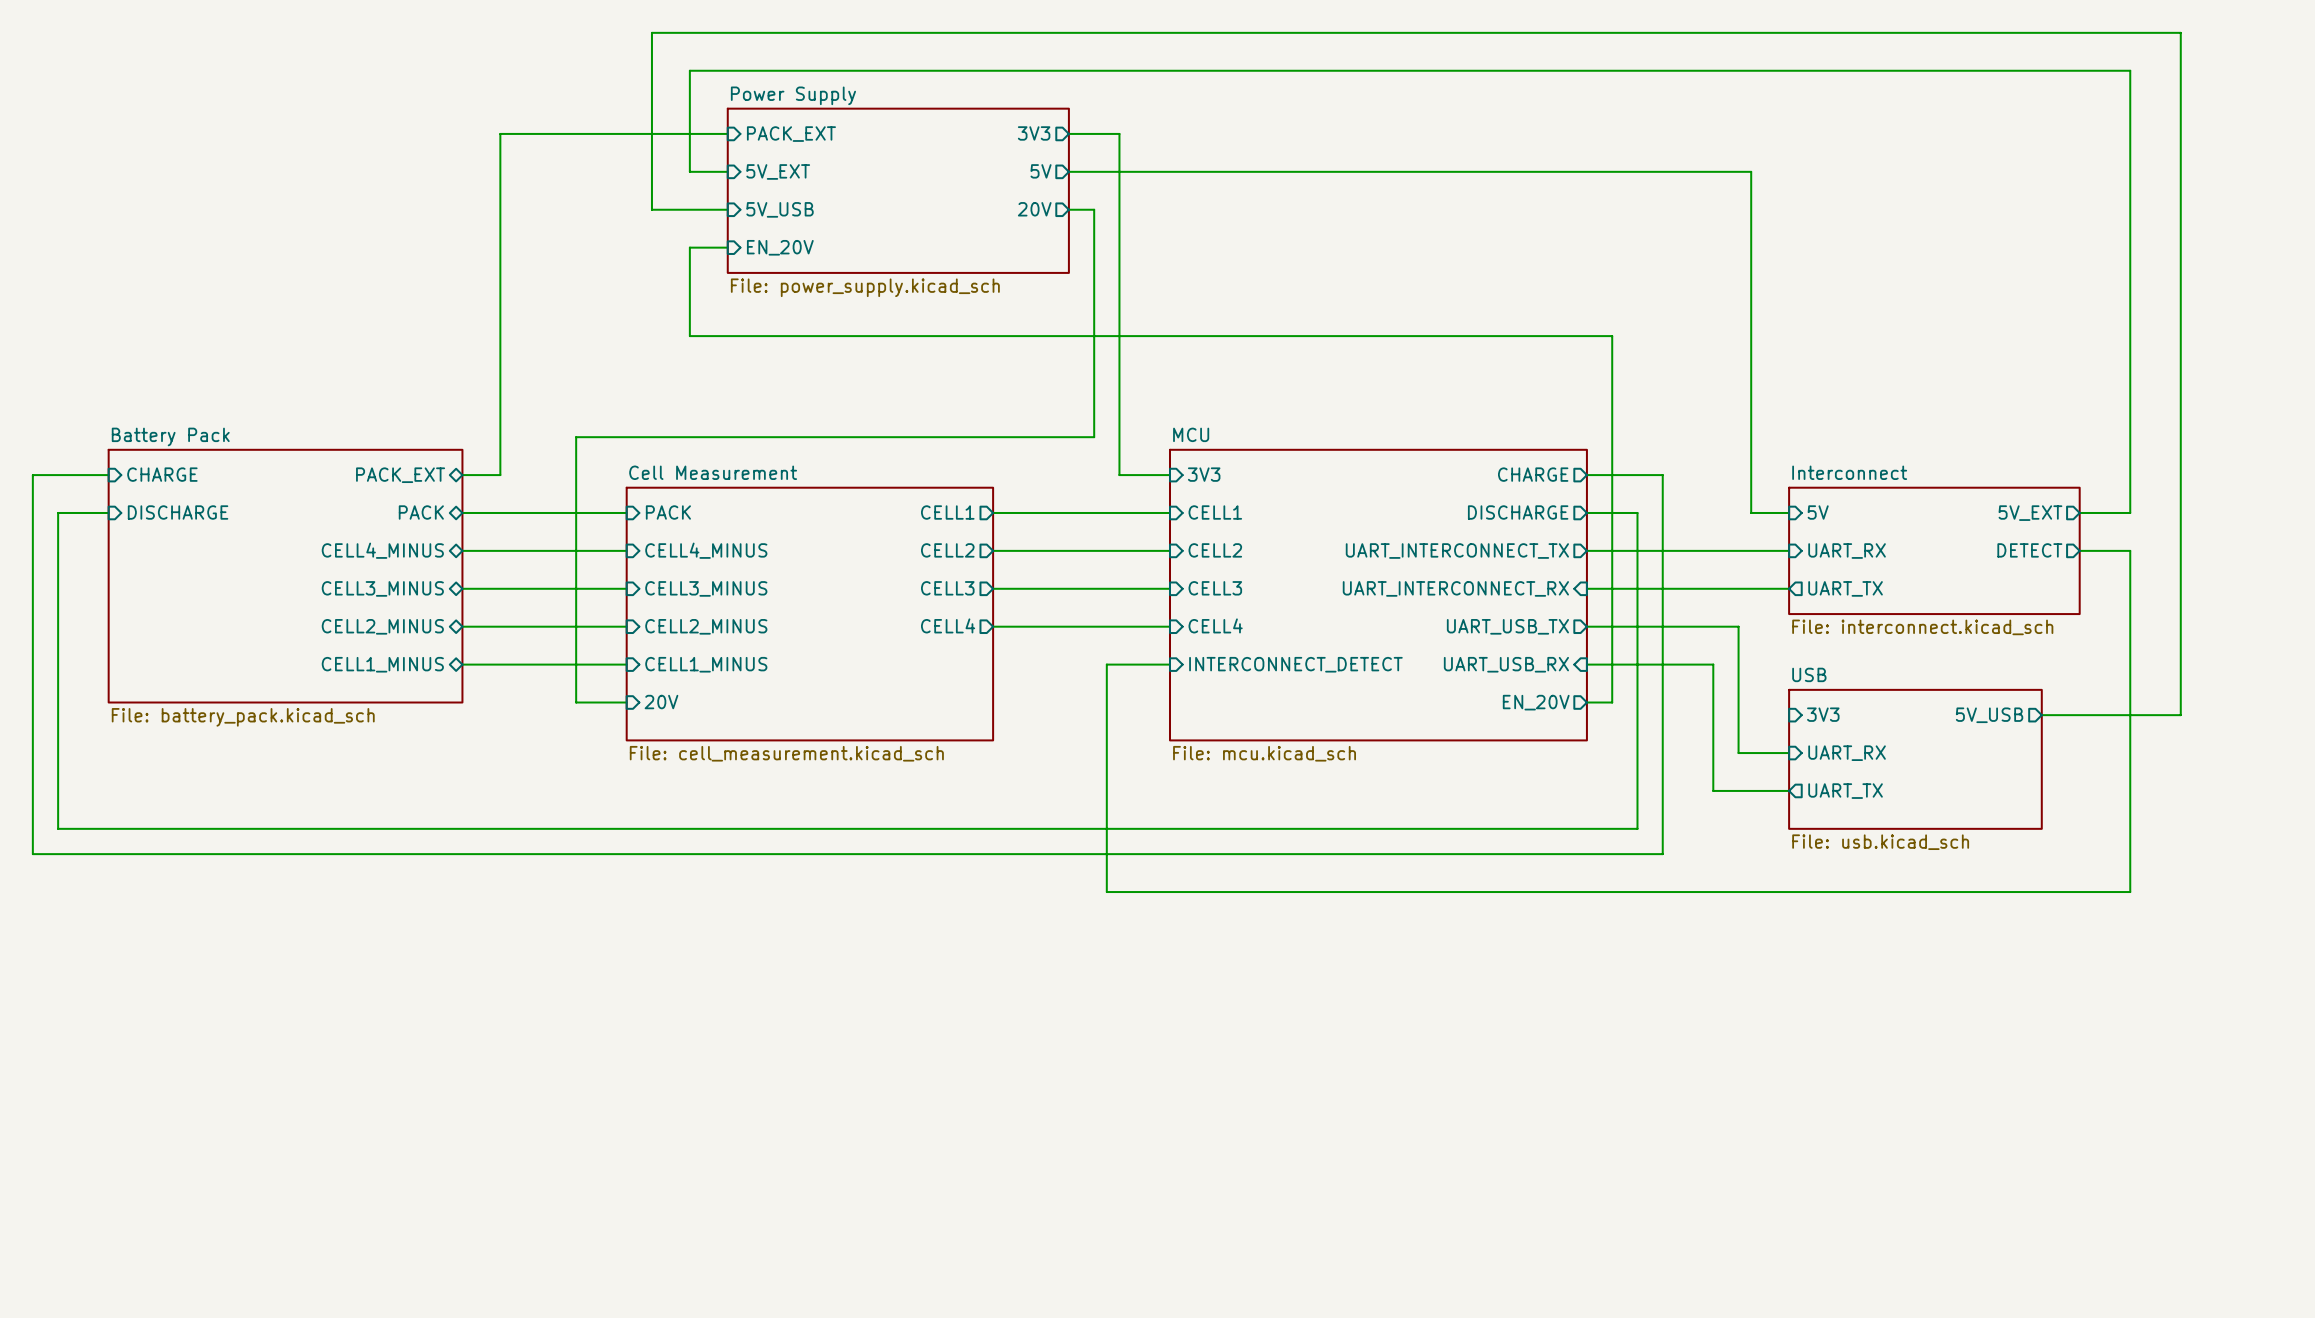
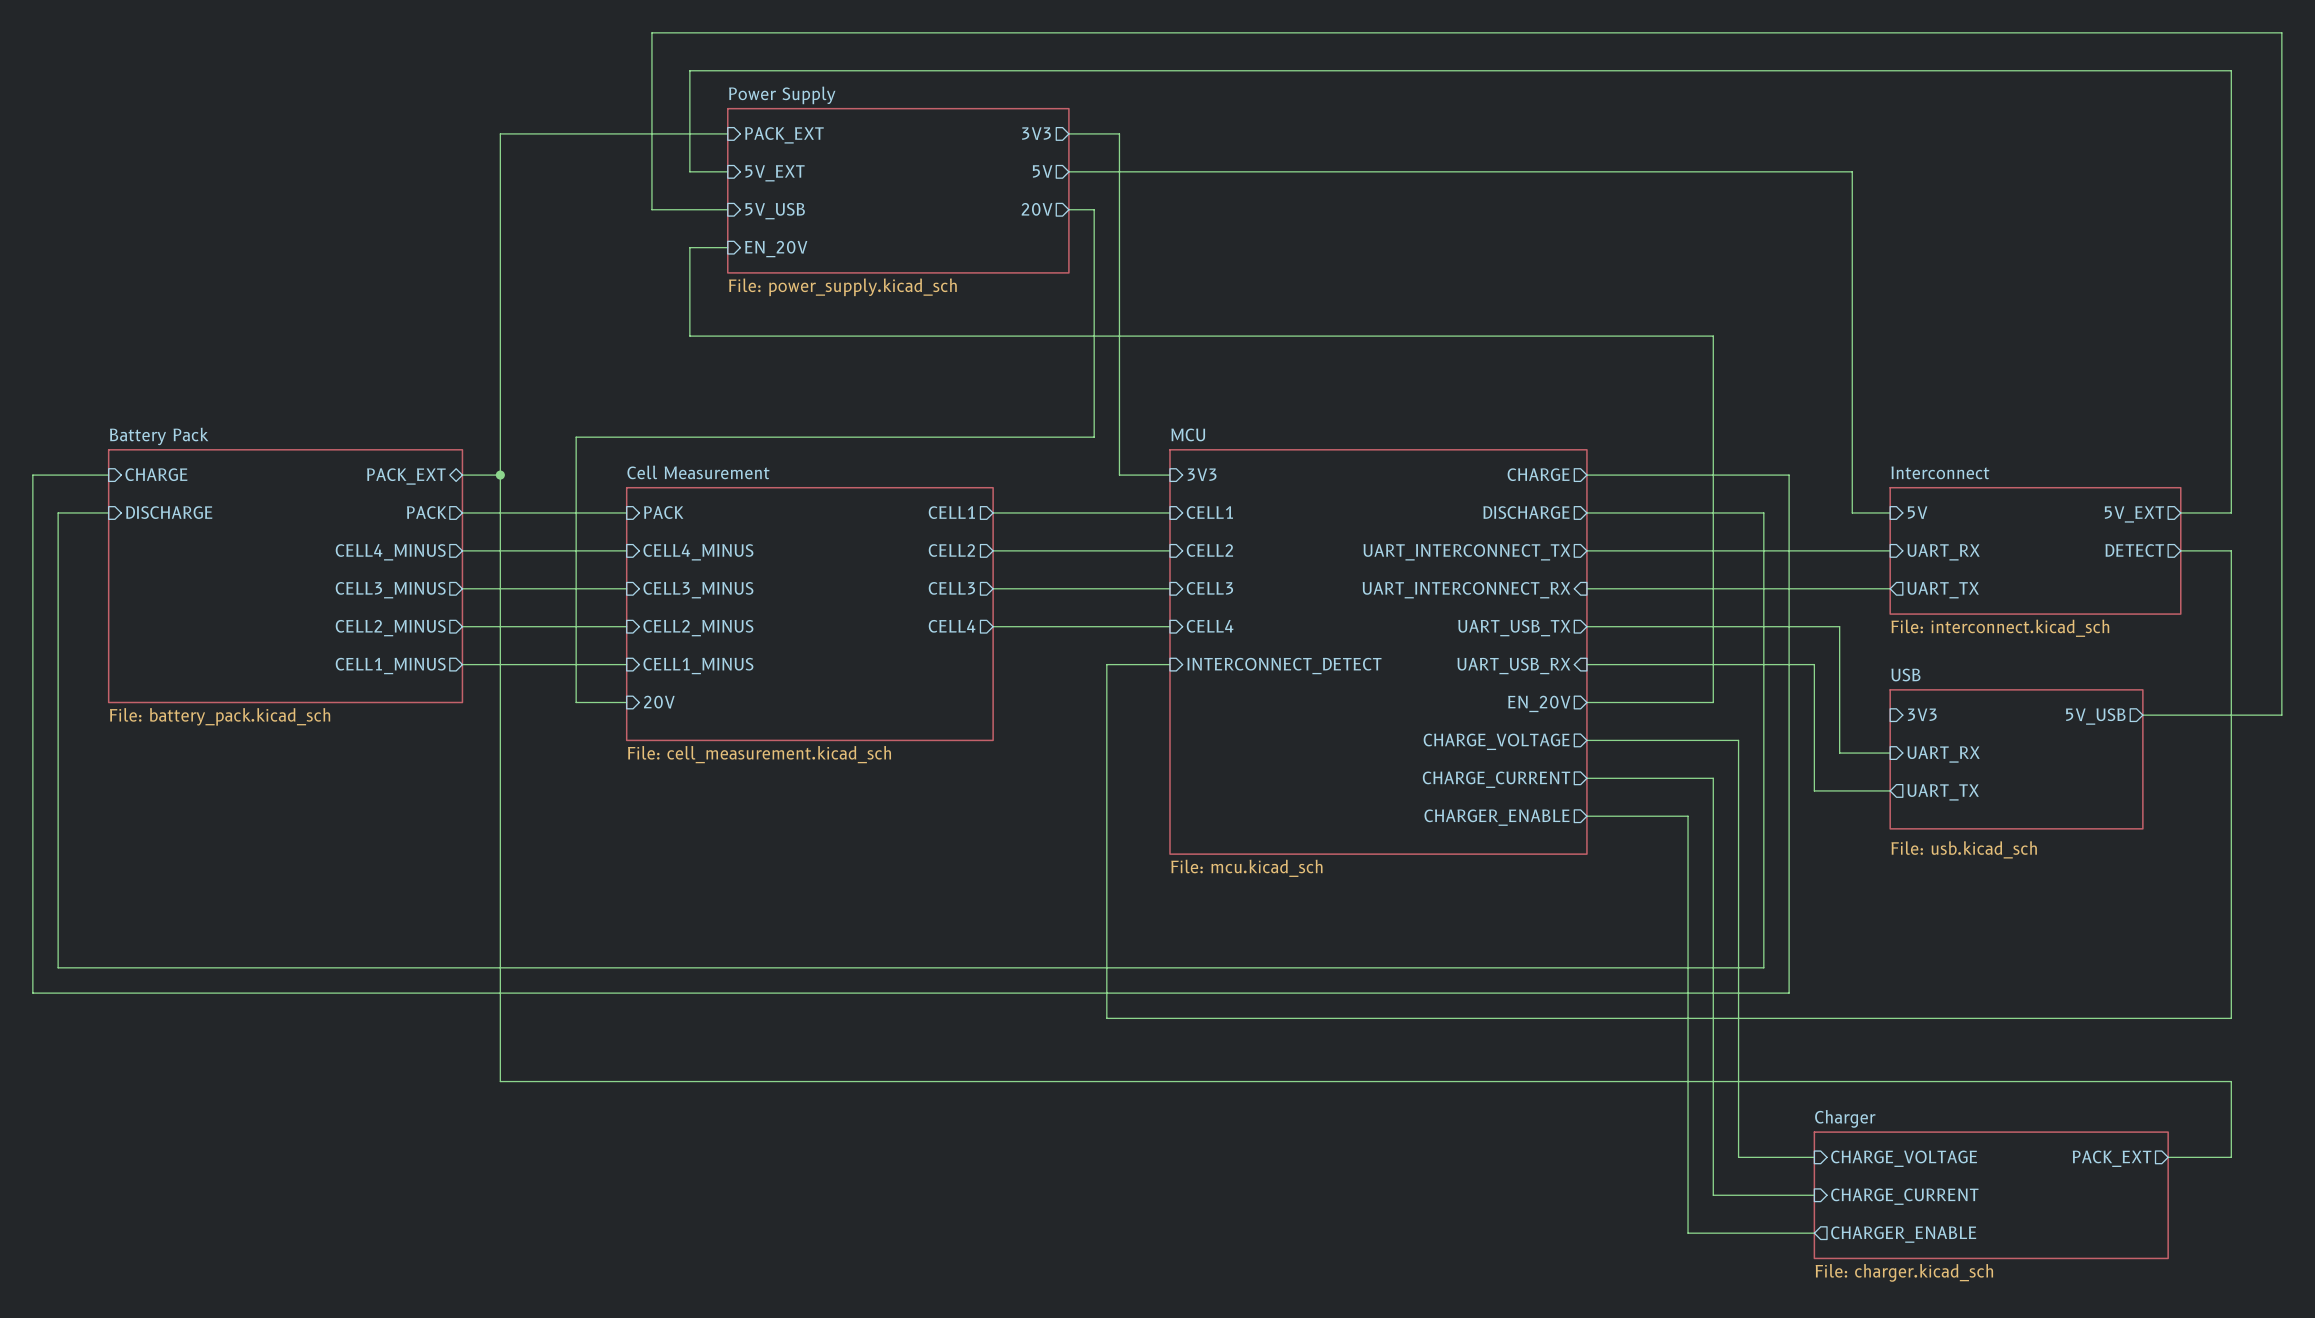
wire: (2180, 32) (2180, 715) -> (2180, 32) (2281, 32) (2281, 715) (2180, 715)
wire: (2130, 70) (2130, 512) (2079, 512) -> (2130, 70) (2231, 70) (2231, 512) (2180, 512)
wire: (1751, 171) (1751, 512) -> (1751, 171) (1852, 171) (1852, 512) (1890, 512)
wire: (1612, 336) (1612, 702) -> (1612, 336) (1713, 336) (1713, 664) (1814, 664) (1814, 790) (1890, 790)
wire: none -> (500, 475) (500, 1081) (2231, 1081) (2231, 1157) (2168, 1157)
junction: none -> (500, 475)
wire: (1662, 475) (1662, 854) (32, 854) -> (1662, 475) (1789, 475) (1789, 993) (32, 993) (32, 854)
sheet pin shape: bidirectional (421, 512) -> output (426, 512)
wire: (1637, 512) (1637, 828) (58, 828) -> (1763, 512) (1763, 967) (58, 967) (58, 828)
wire: none -> (1637, 512) (1751, 512)
wire: (1763, 512) (1789, 512) -> none
sheet pin position: 5V (1818, 512) -> 5V (1917, 512)
sheet pin position: 5V_EXT (2030, 513) -> 5V_EXT (2134, 514)
sheet pin shape: bidirectional (382, 550) -> output (390, 552)
wire: none -> (1789, 550) (1890, 550)
sheet Interconnect position: (1934, 550) -> (2035, 550)
sheet pin position: DETECT (2029, 550) -> DETECT (2134, 550)
wire: (2079, 550) (2130, 550) (2130, 892) (1106, 892) -> (2180, 550) (2231, 550) (2231, 1018) (1106, 1018) (1106, 892)
sheet pin position: UART_RX (1847, 551) -> UART_RX (1943, 552)
sheet pin shape: bidirectional (382, 588) -> output (390, 590)
wire: none -> (1789, 588) (1890, 588)
sheet pin position: UART_TX (1845, 588) -> UART_TX (1943, 590)
sheet MCU: File: mcu.kicad_sch (1378, 595) -> none
sheet pin shape: bidirectional (382, 626) -> output (390, 628)
wire: (1738, 626) (1738, 740) -> (1738, 626) (1839, 626) (1839, 753) (1890, 753)
sheet MCU: none -> File: mcu.kicad_sch (1378, 651)
sheet pin shape: bidirectional (382, 664) -> output (390, 666)
wire: (1713, 702) (1713, 778) -> (1713, 702) (1612, 702)
sheet pin position: 3V3 (1823, 714) -> 3V3 (1922, 714)
sheet pin position: 5V_USB (1989, 715) -> 5V_USB (2095, 716)
wire: (2041, 715) (2142, 715) -> none
sheet pin: none -> CHARGE_VOLTAGE (1496, 741)
wire: none -> (1586, 740) (1738, 740)
wire: (1738, 753) (1789, 753) -> (1738, 753) (1738, 1157) (1814, 1157)
sheet pin position: UART_RX (1847, 753) -> UART_RX (1943, 754)
sheet USB position: (1915, 759) -> (2016, 759)
sheet pin: none -> CHARGE_CURRENT (1496, 779)
wire: none -> (1586, 778) (1713, 778)
wire: (1713, 790) (1789, 790) -> (1713, 790) (1713, 1195) (1814, 1195)
sheet pin position: UART_TX (1845, 791) -> UART_TX (1943, 792)
sheet pin: none -> CHARGER_ENABLE (1497, 817)
wire: none -> (1586, 816) (1688, 816) (1688, 1233) (1814, 1233)
sheet USB value position: File: usb.kicad_sch (1880, 842) -> File: usb.kicad_sch (1964, 849)
sheet pin: none -> CHARGE_VOLTAGE (1904, 1158)
sheet pin: none -> PACK_EXT (2112, 1158)
sheet pin: none -> CHARGE_CURRENT (1904, 1196)
sheet Charger: none -> File: charger.kicad_sch (1991, 1195)
sheet pin: none -> CHARGER_ENABLE (1903, 1234)

